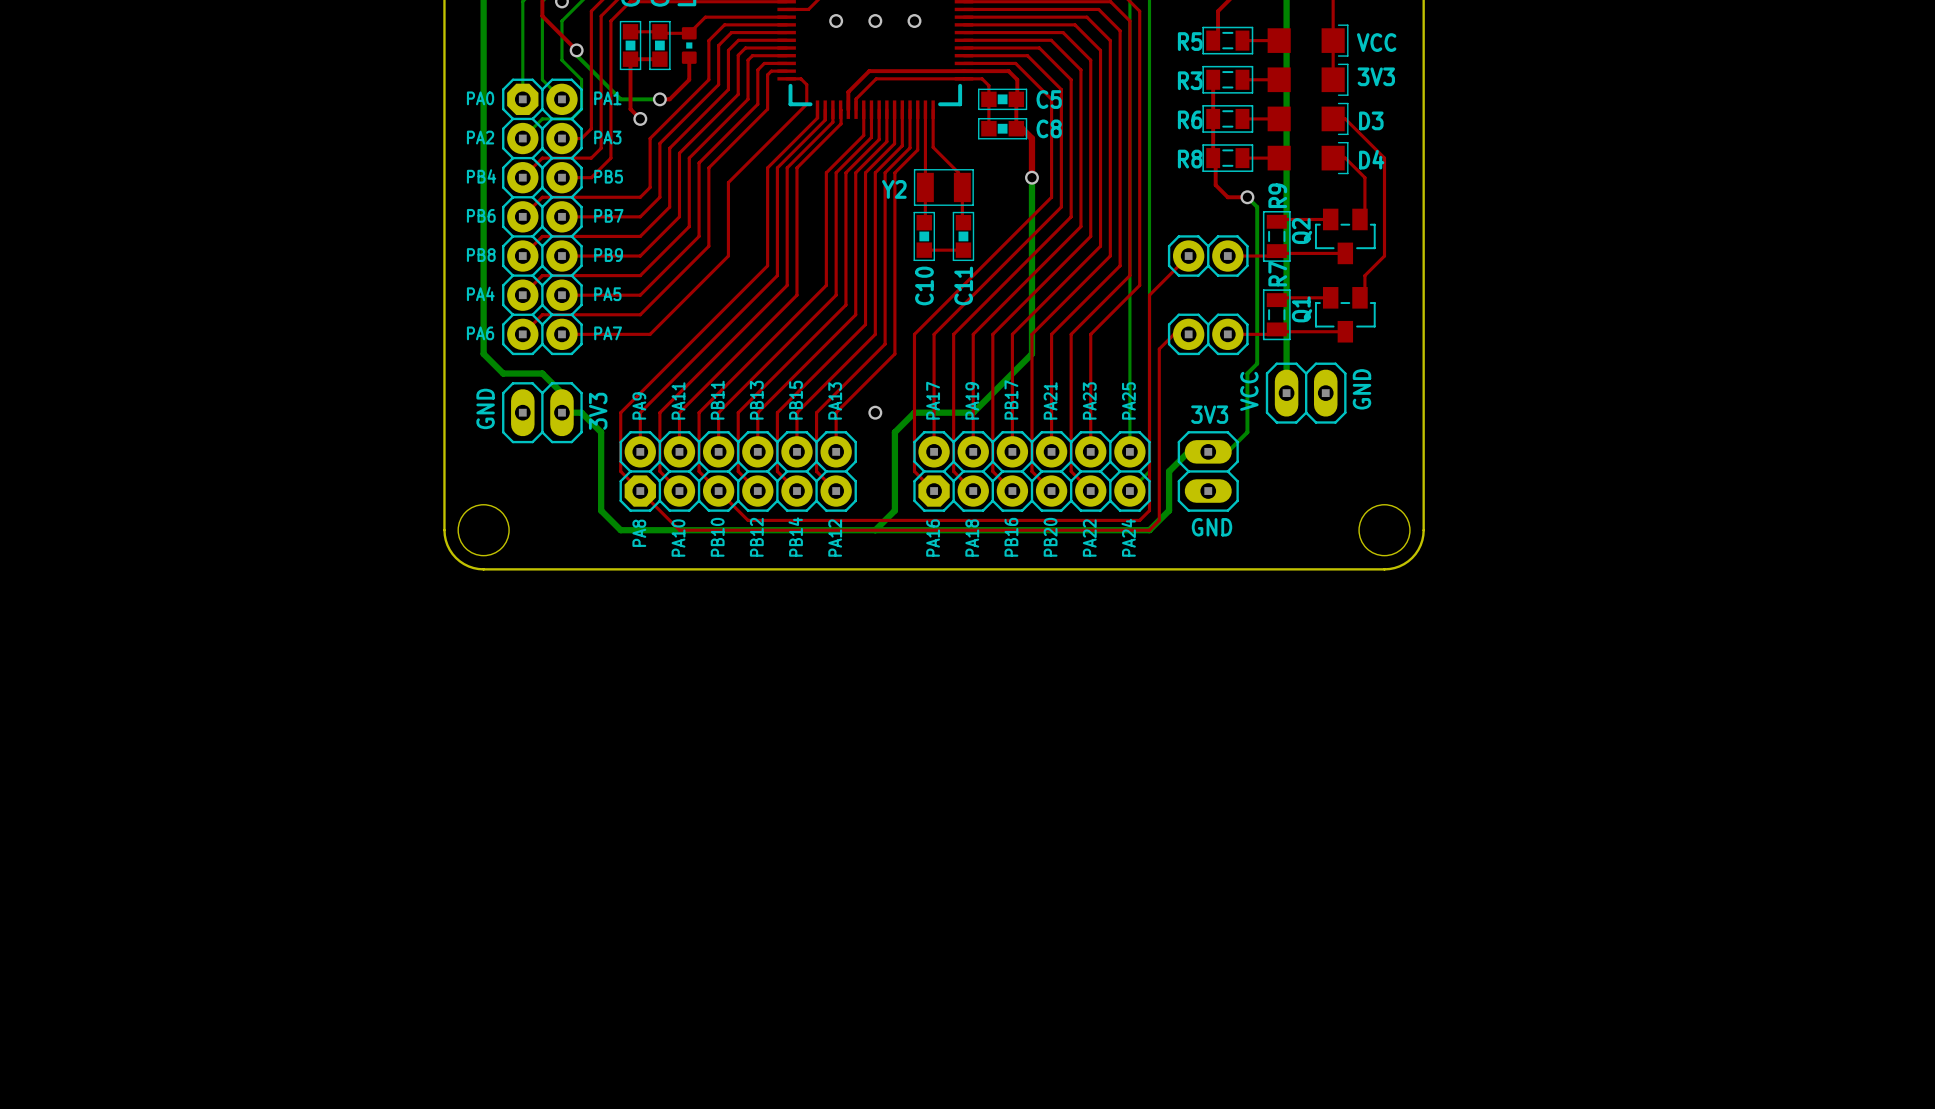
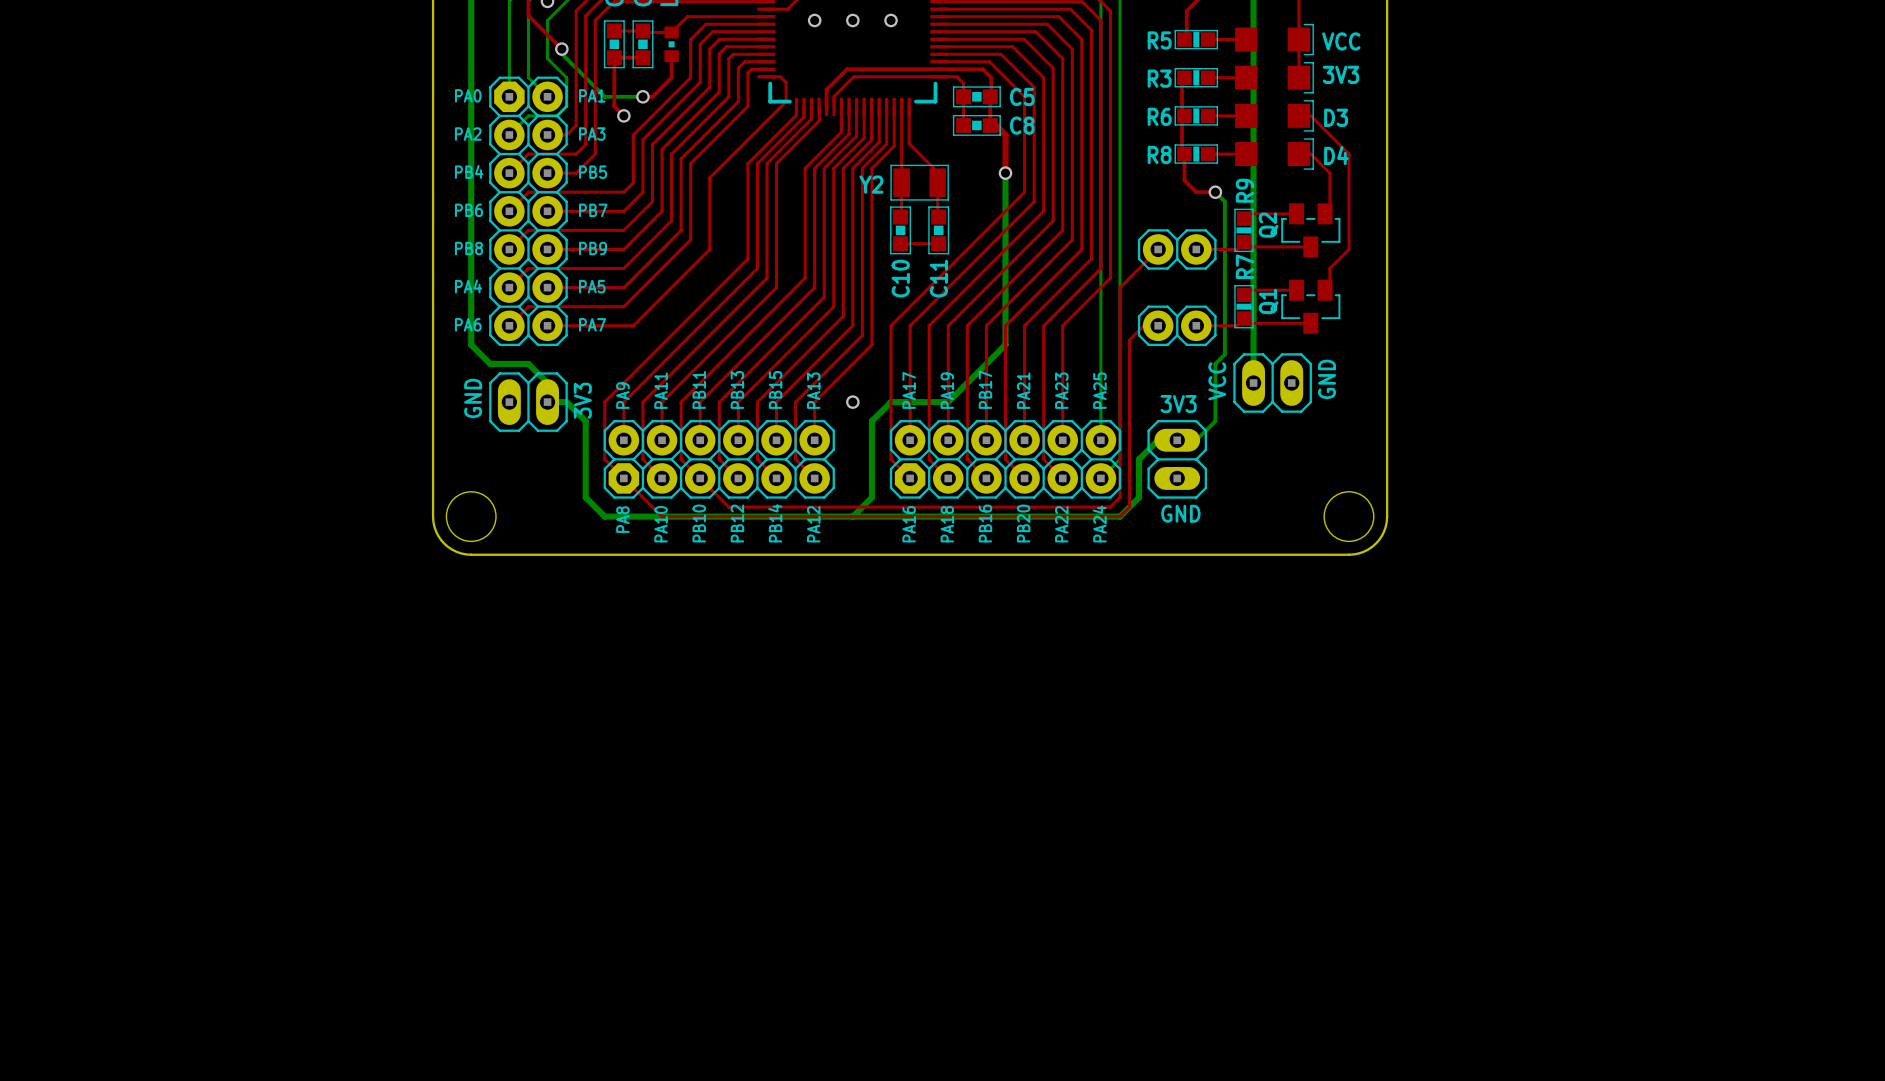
R5 footprint: [1202, 26, 1254, 55] -> [1174, 30, 1218, 49]
R3 footprint: [1202, 65, 1254, 94] -> [1174, 68, 1218, 88]
R6 footprint: [1202, 105, 1254, 133] -> [1174, 106, 1218, 126]
R8 footprint: [1202, 144, 1254, 172] -> [1174, 144, 1218, 164]
R9 footprint: [1262, 210, 1291, 262] -> [1234, 208, 1254, 252]
R7 footprint: [1262, 289, 1291, 341] -> [1234, 285, 1254, 329]

